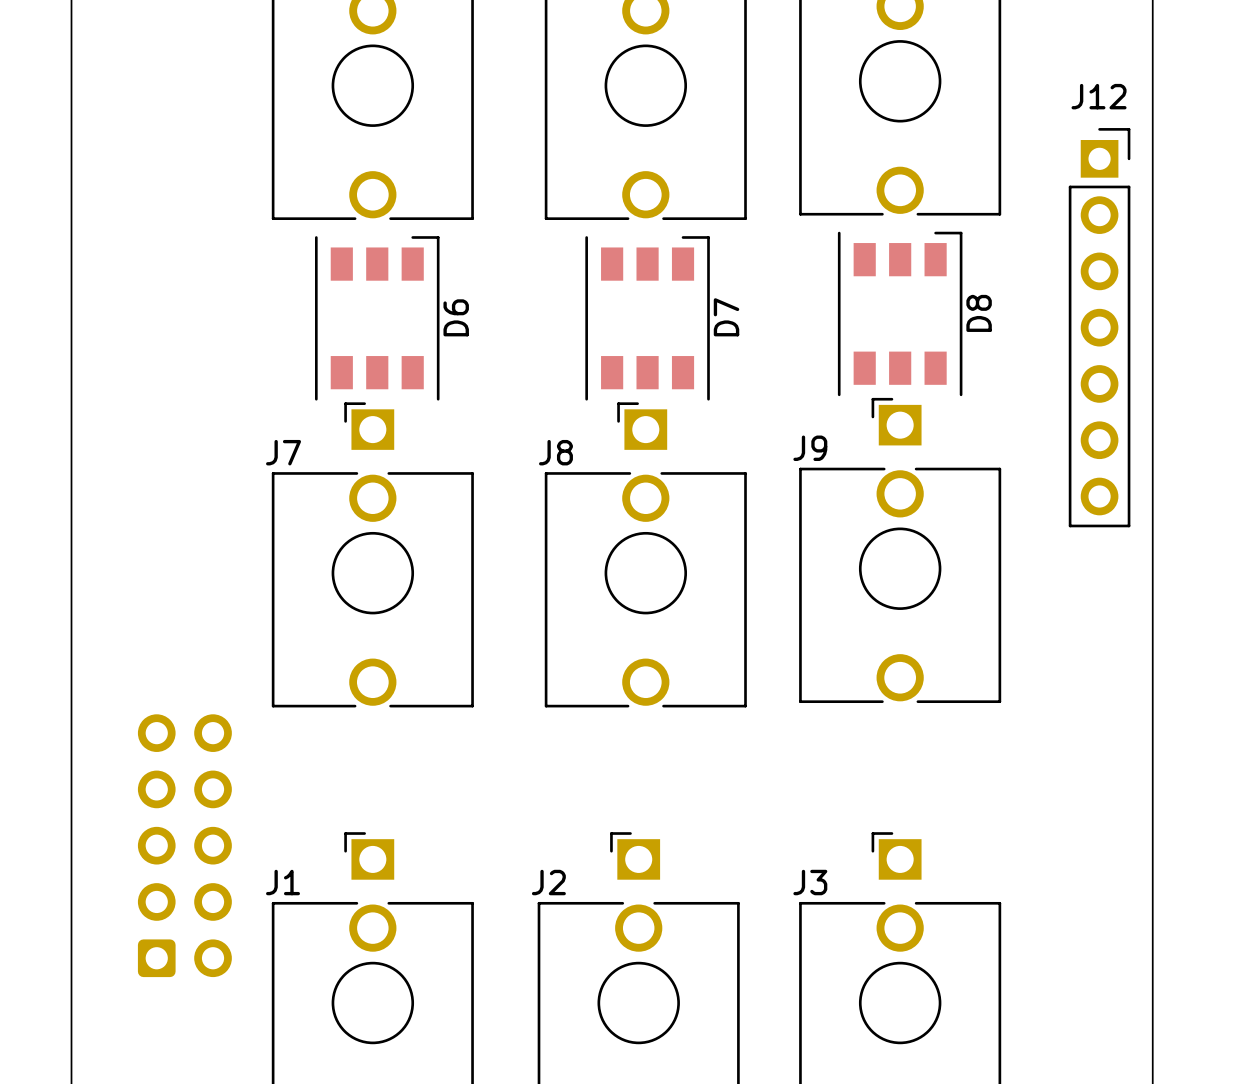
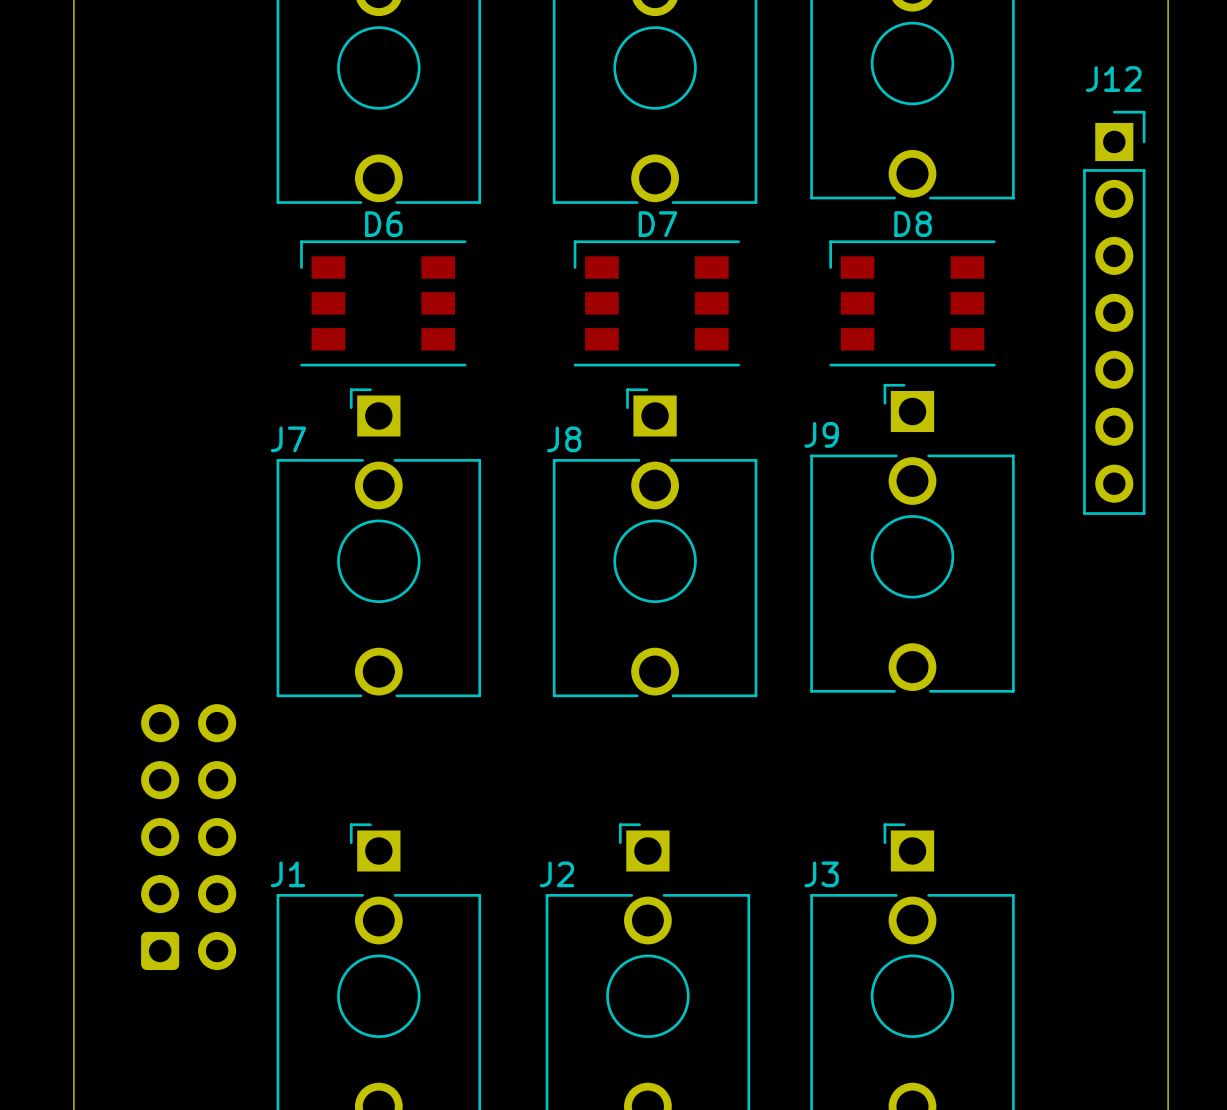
D8 rotation: 0° (900, 313) -> 90° counterclockwise (912, 303)
D6 rotation: 0° (377, 318) -> 90° counterclockwise (383, 303)
D7 rotation: 0° (647, 318) -> 90° counterclockwise (656, 303)

